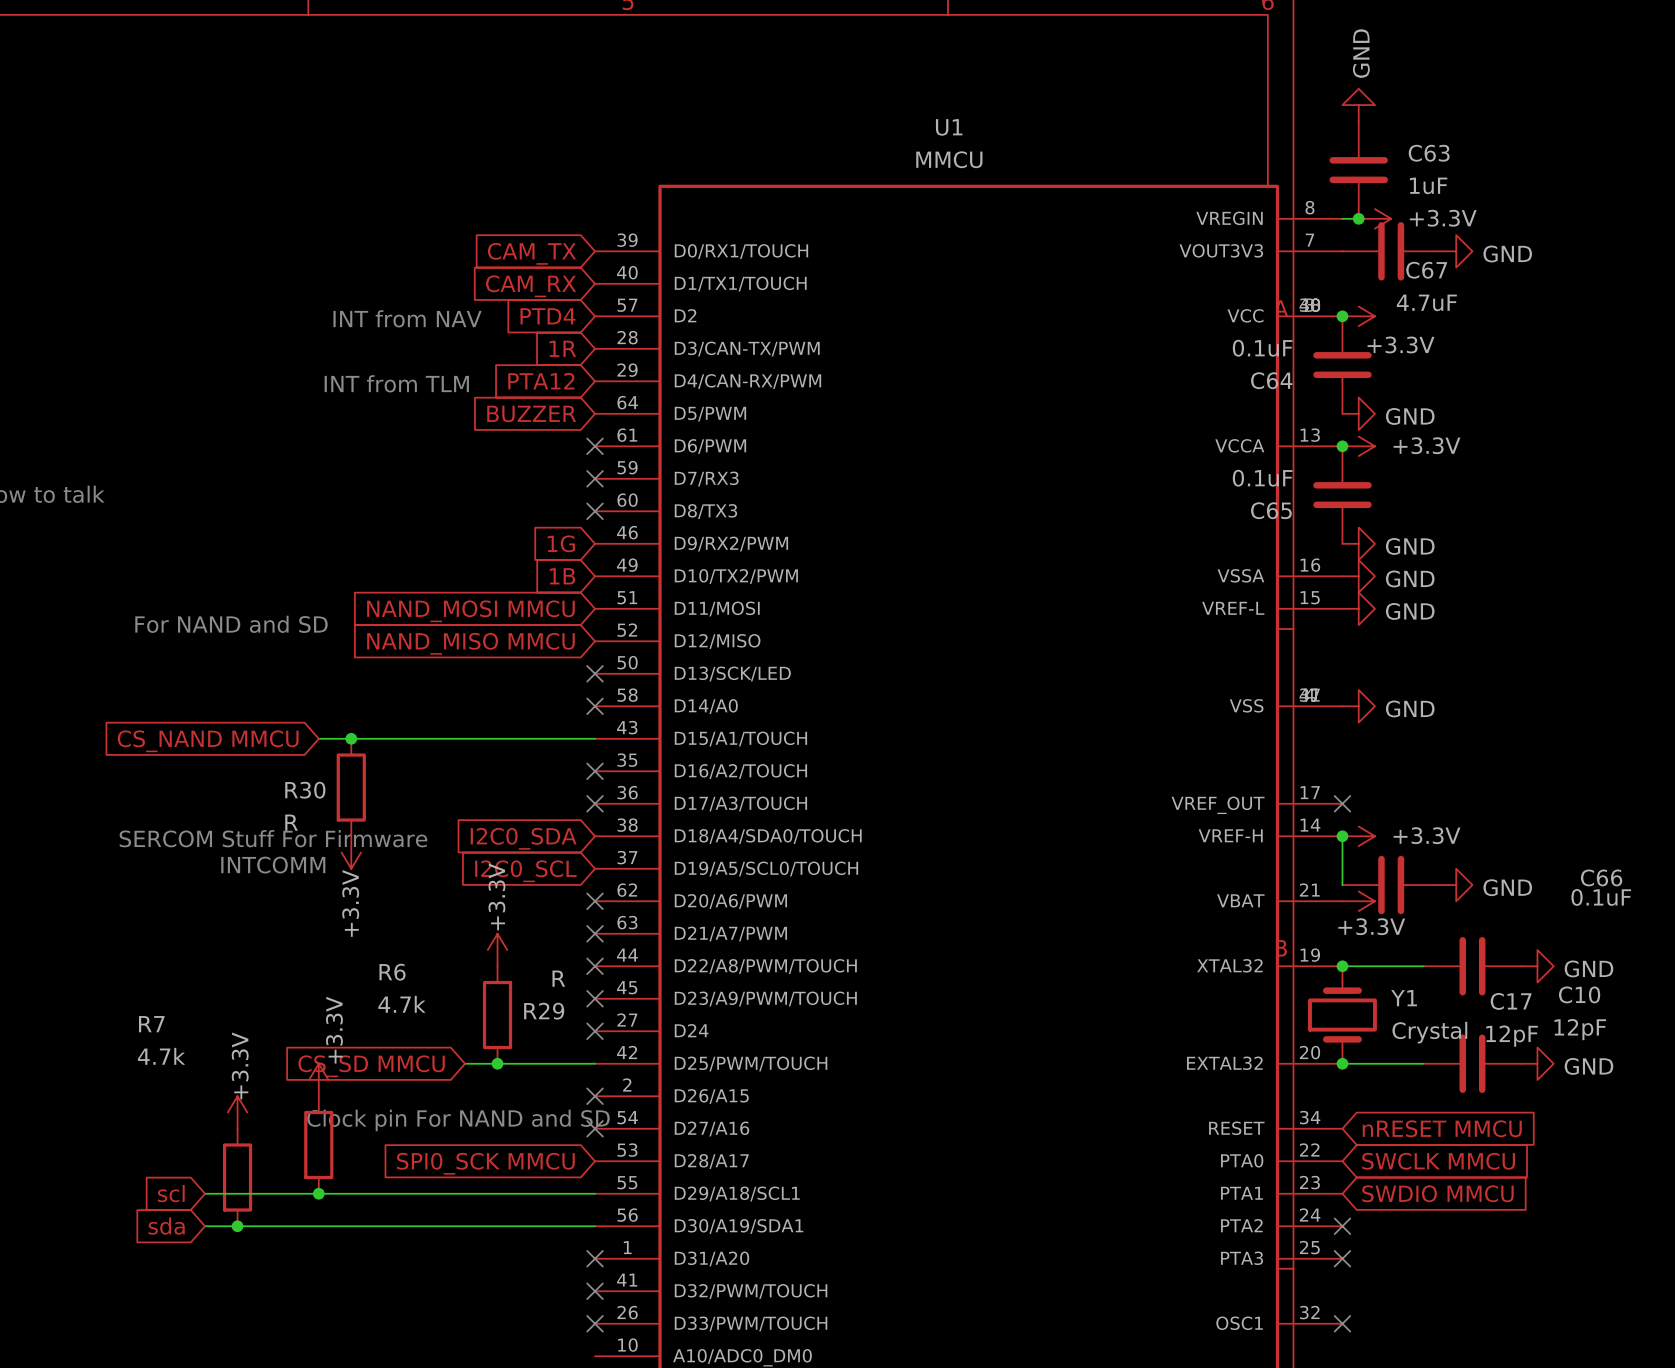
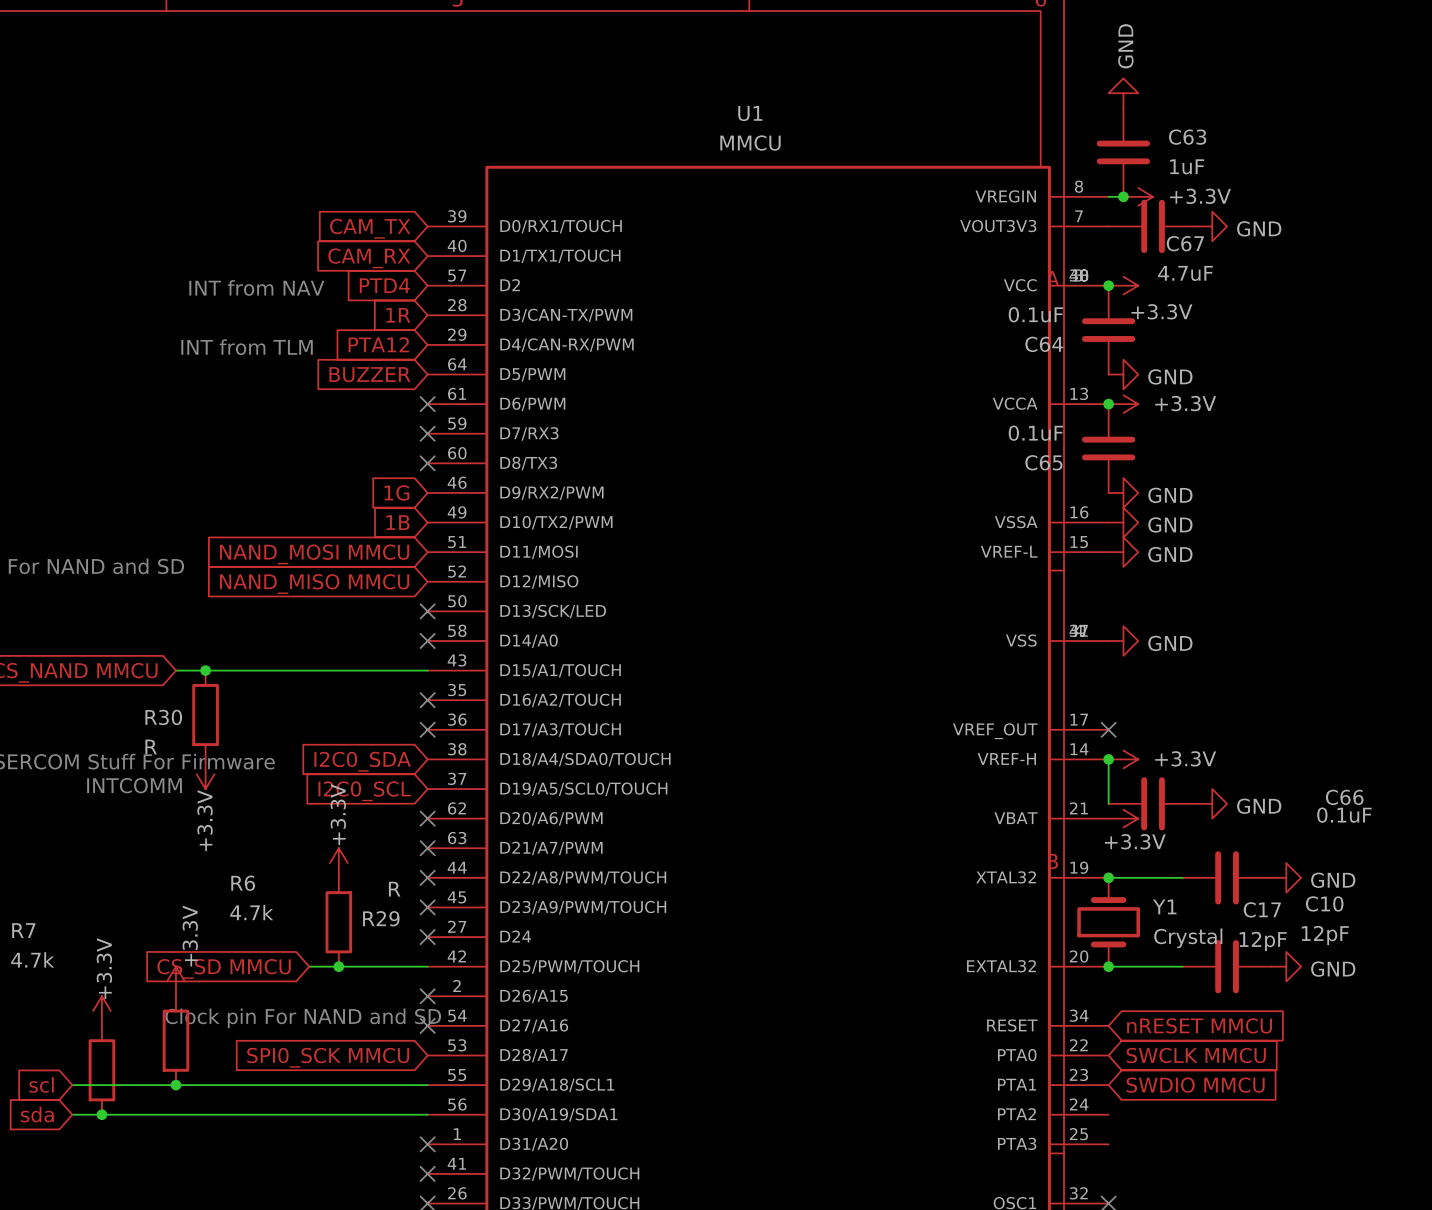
no-connect mark: (1342, 1226) -> none
no-connect mark: (1342, 1258) -> none

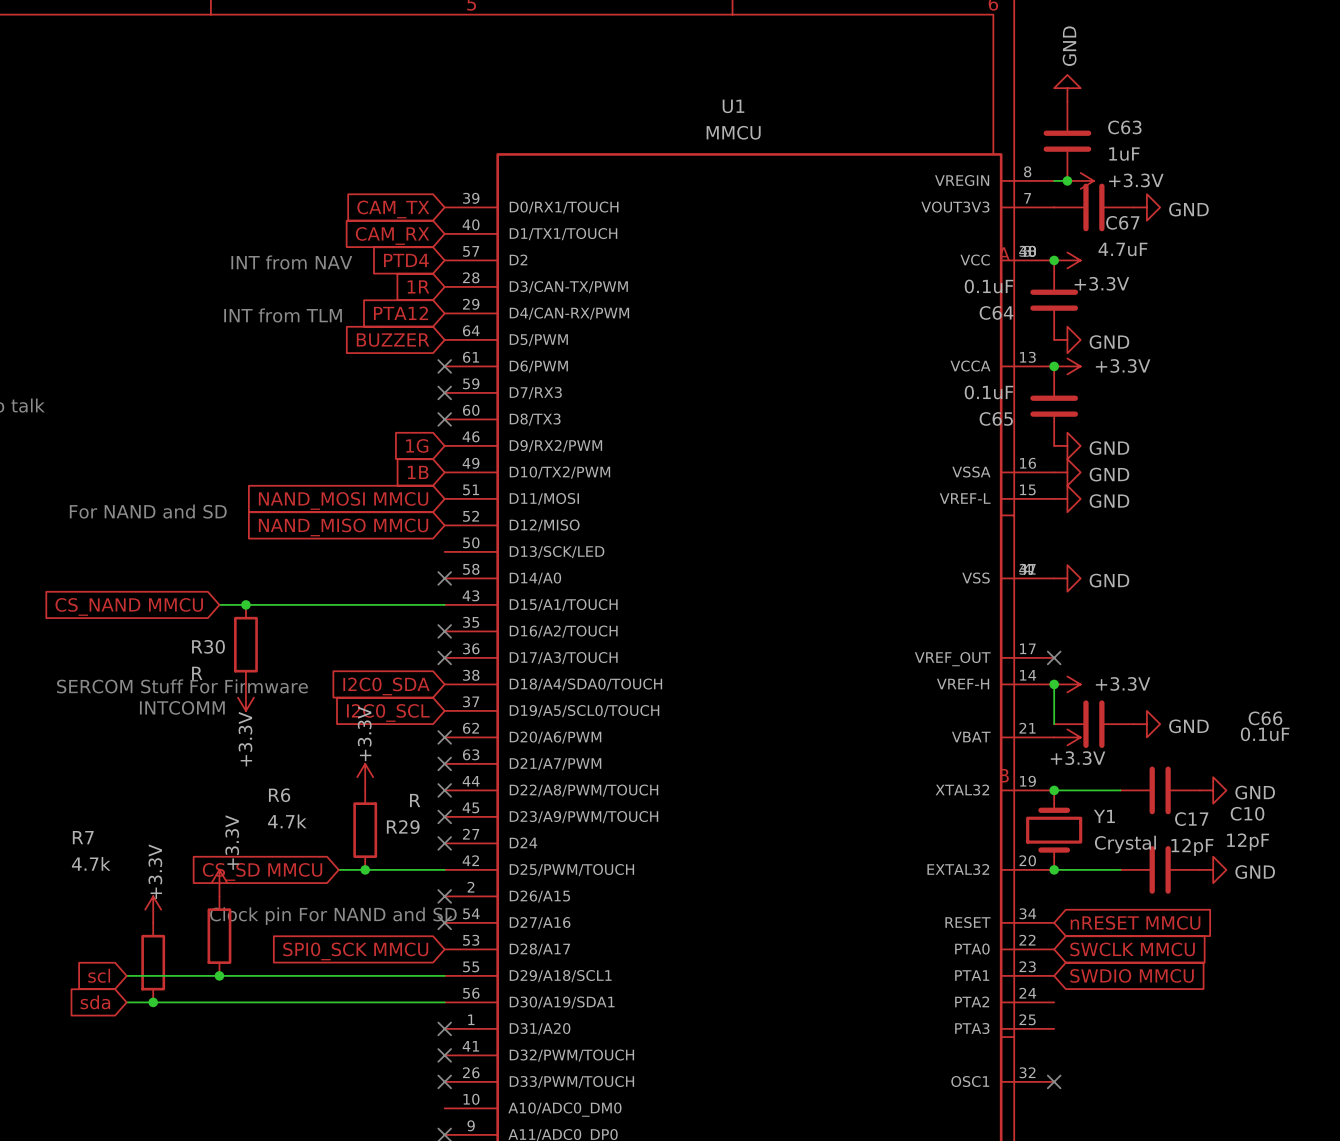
no-connect mark: (427, 611) -> none

